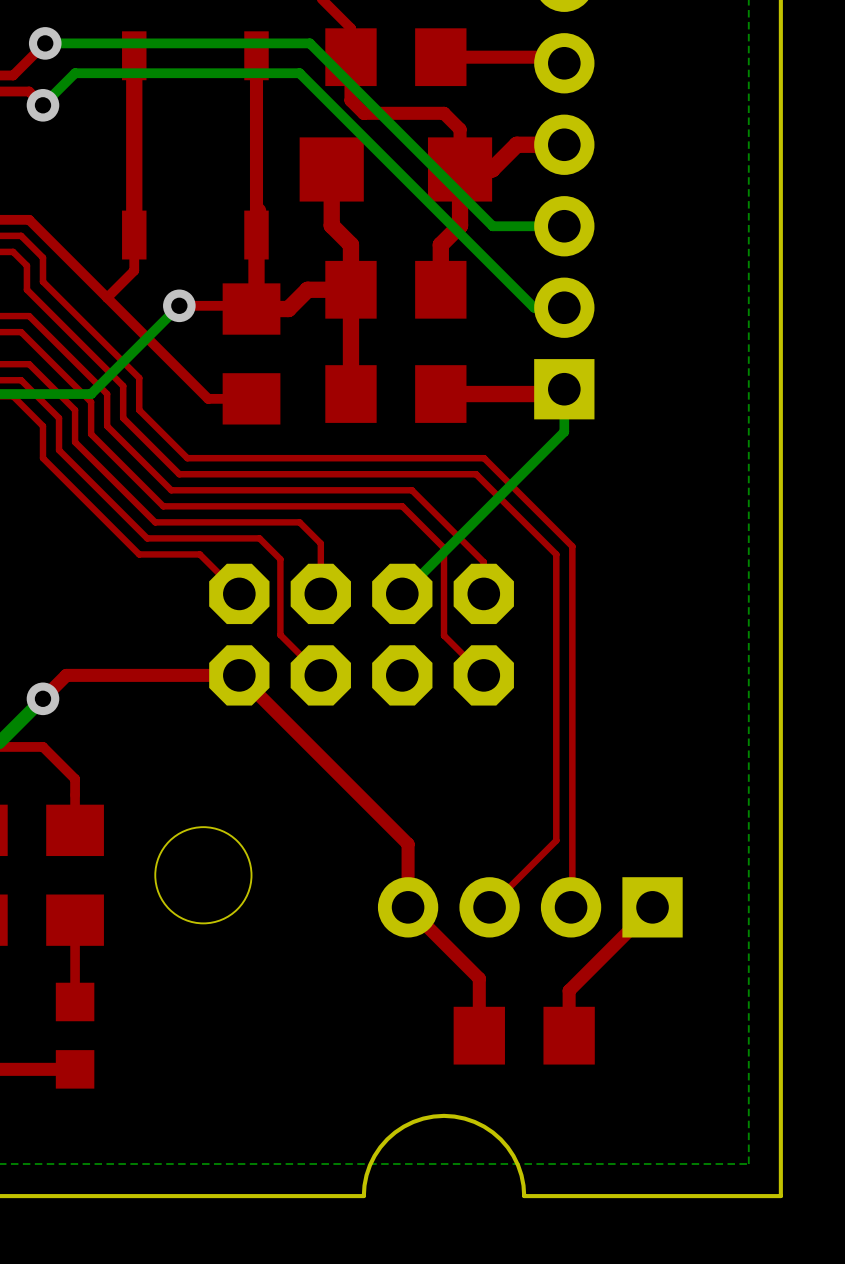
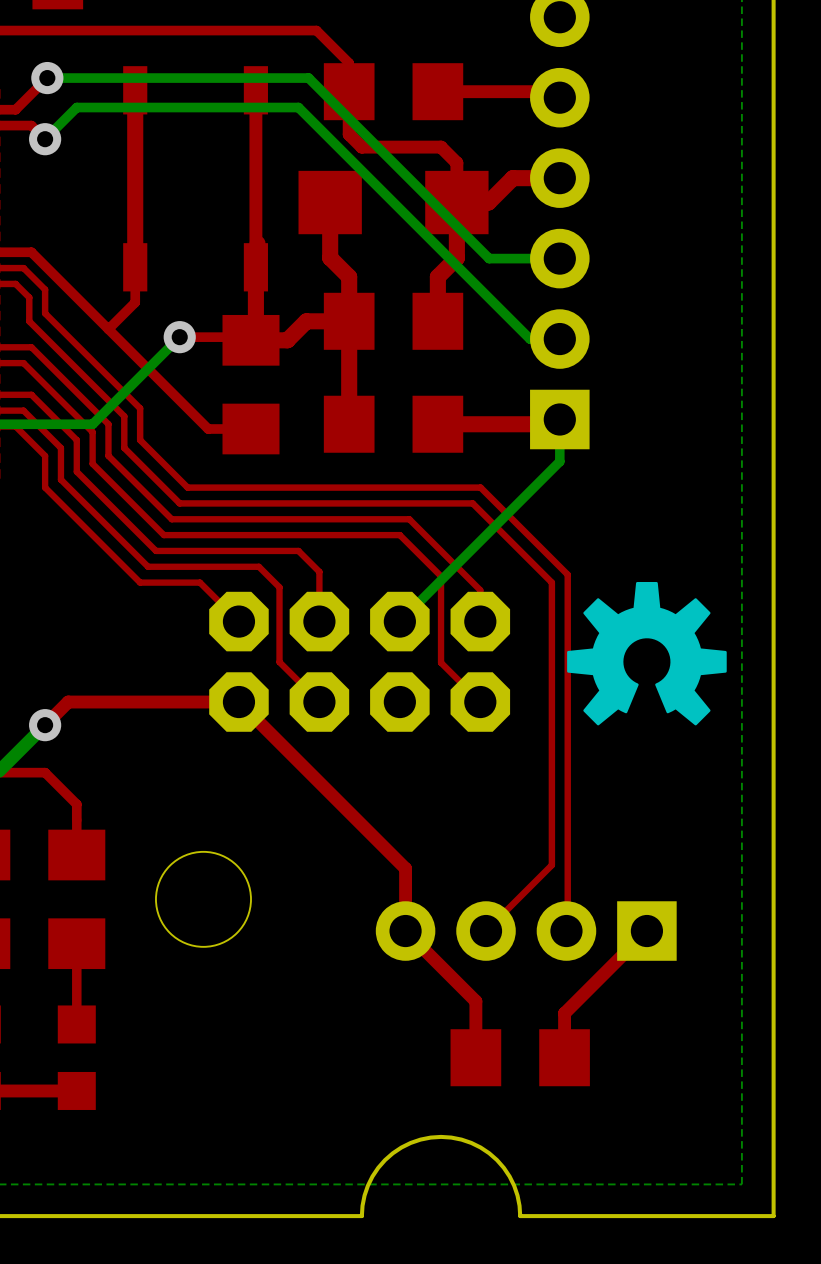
drawing: none -> [567, 582, 727, 726]

